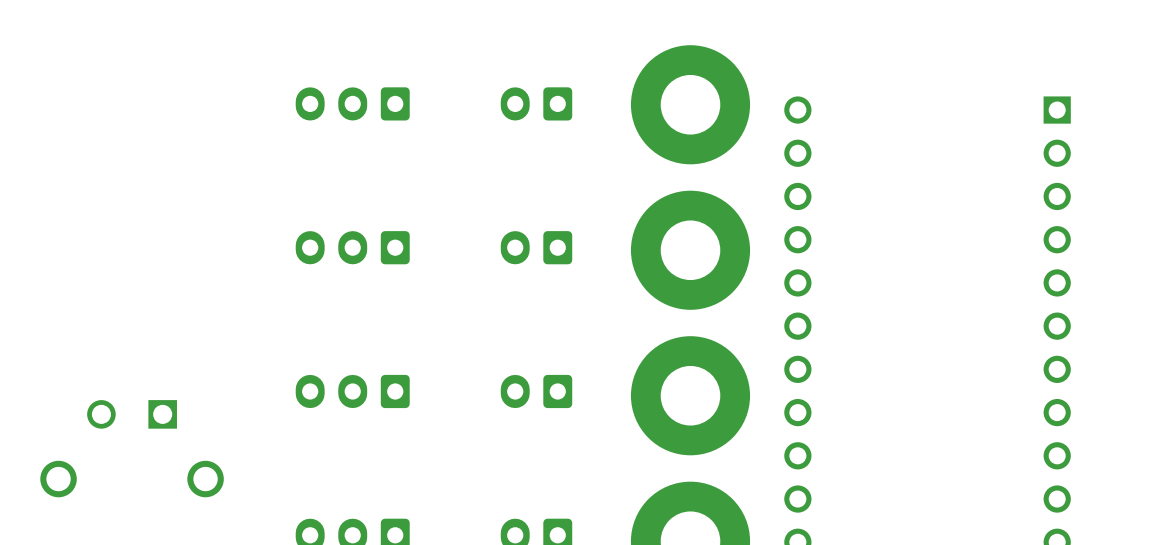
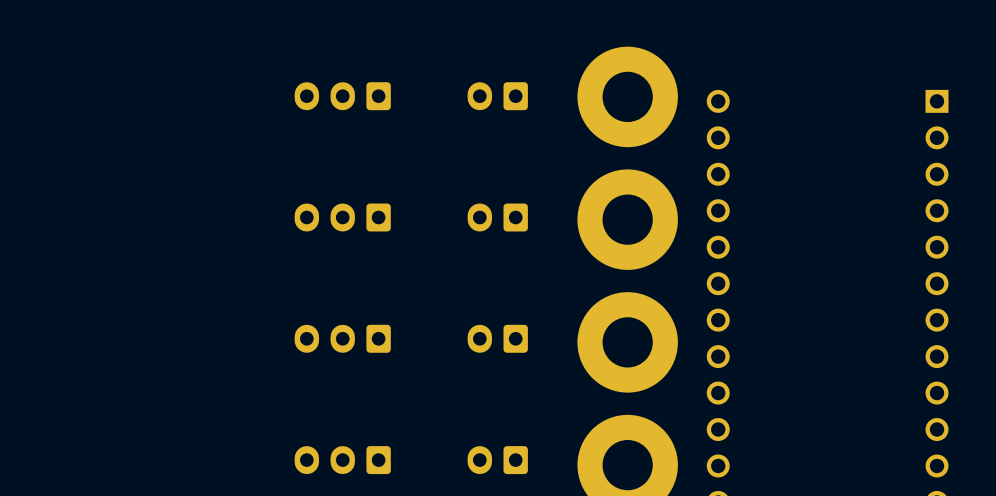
part: (132, 448) -> none

